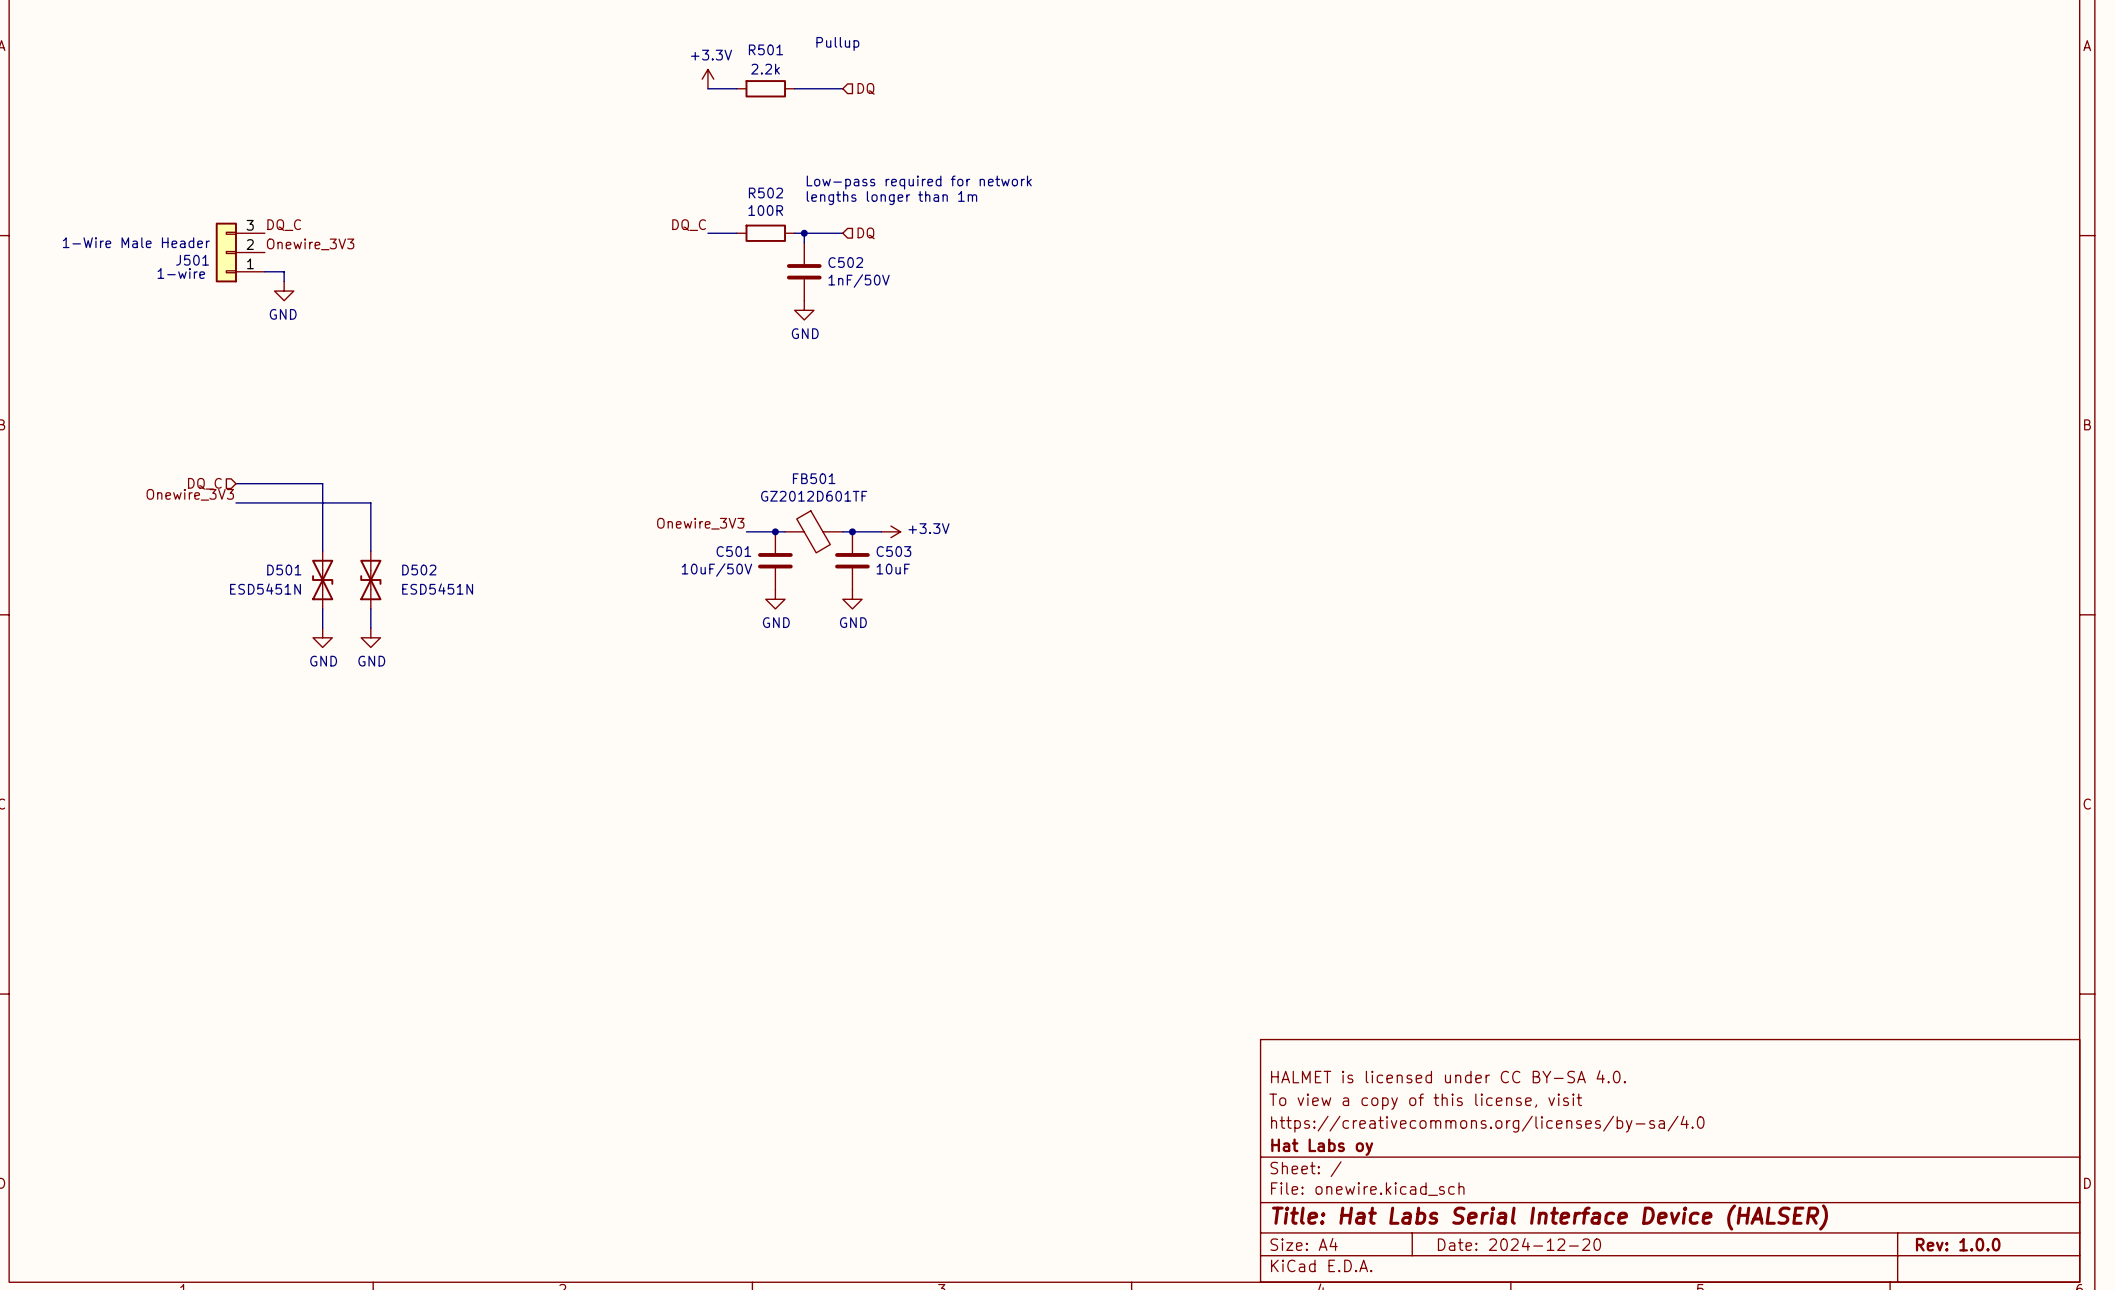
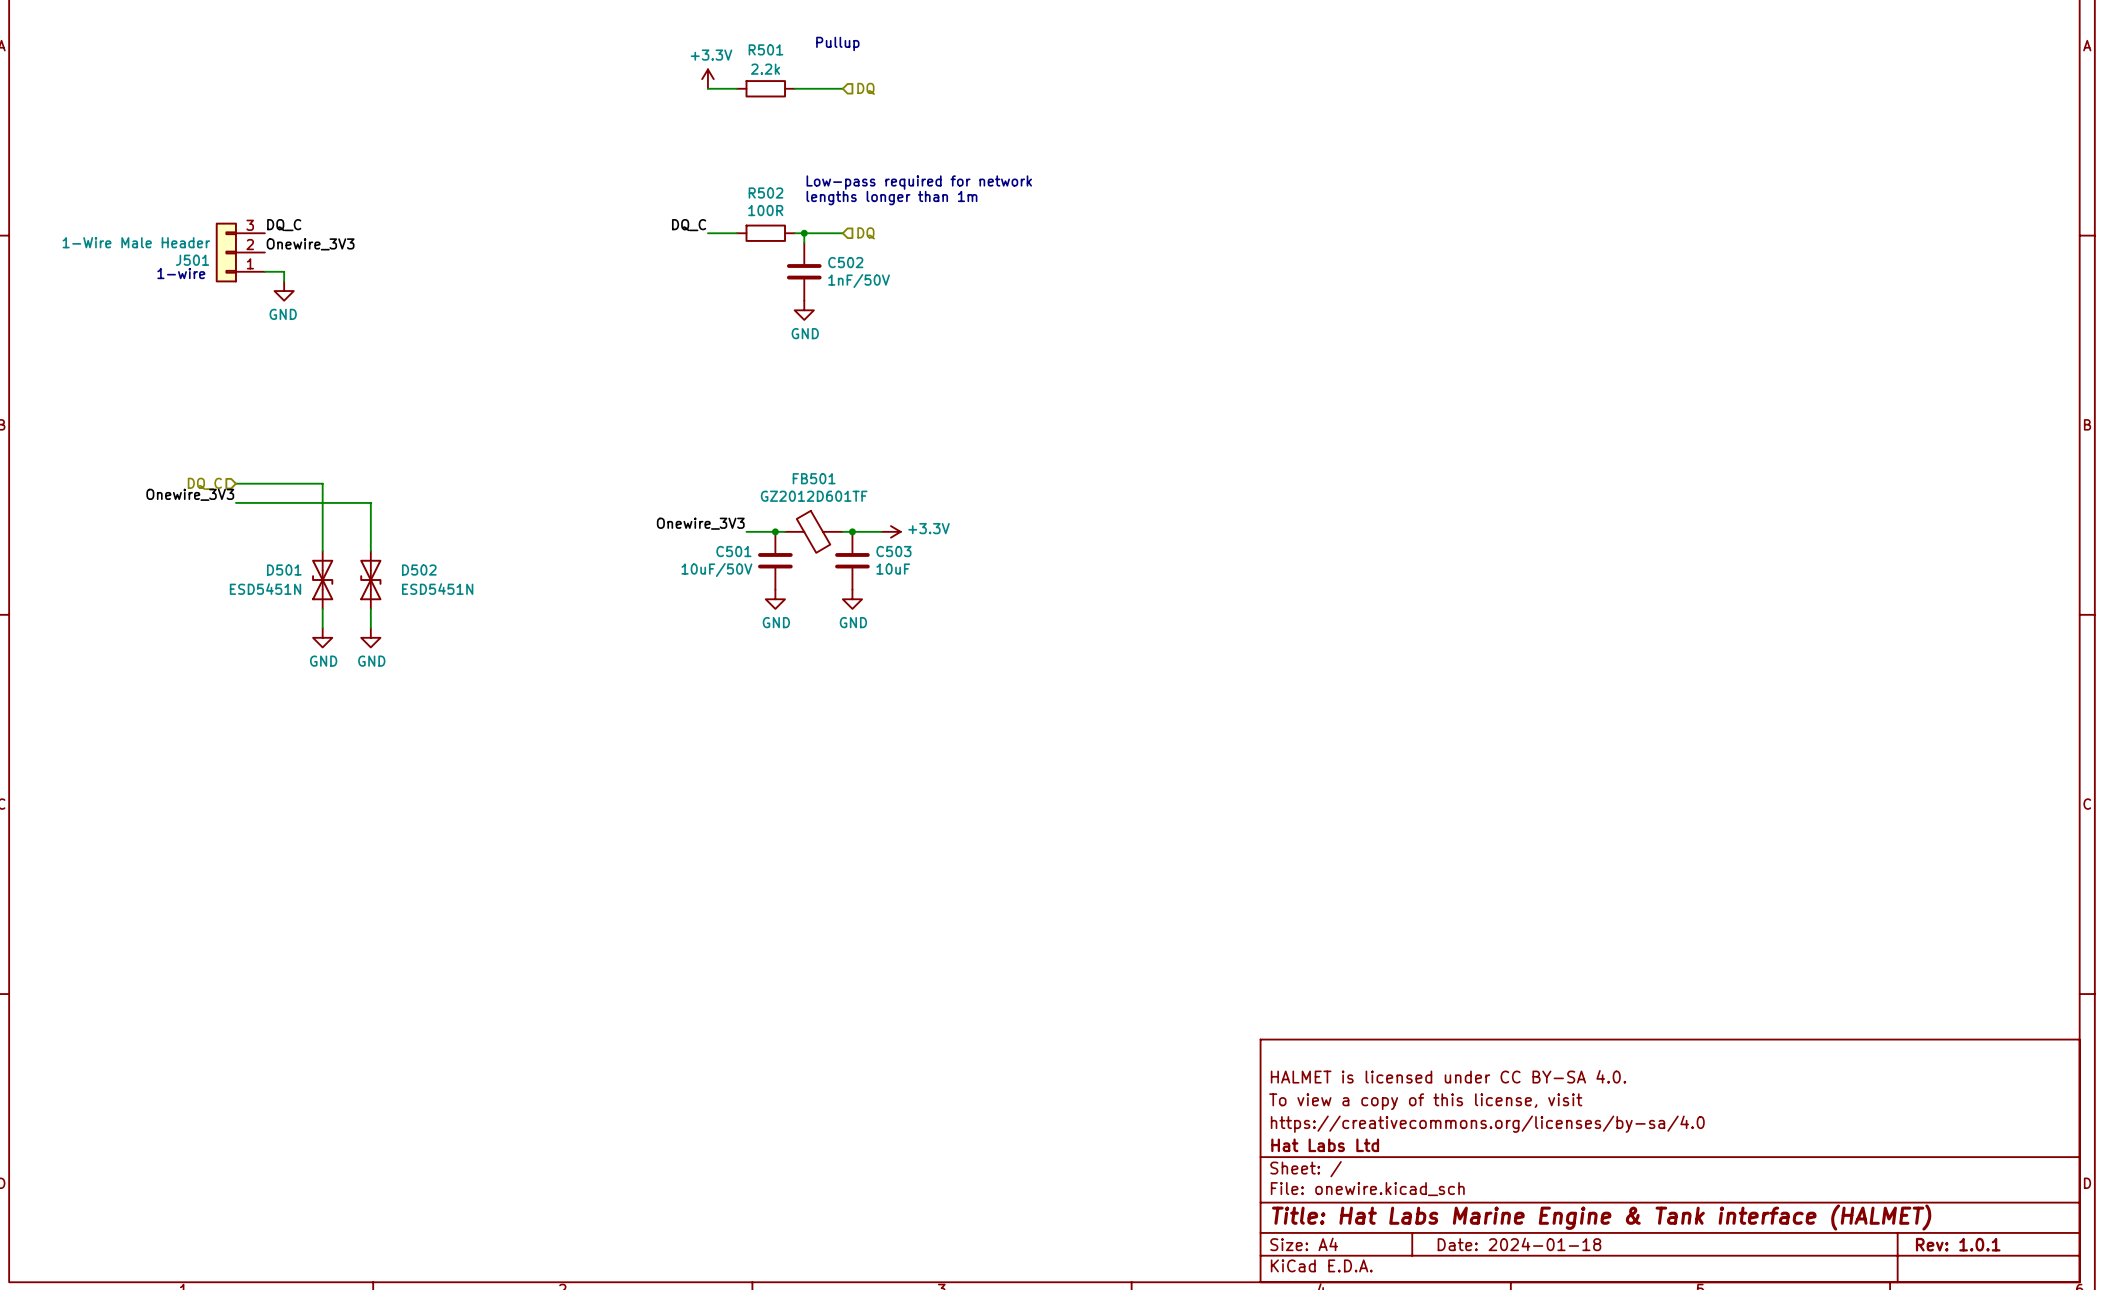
title block: Hat Labs oy (1322, 1147) -> Hat Labs Ltd (1325, 1145)
title block: Title: Hat Labs Serial Interface Device (HALSER) (1550, 1217) -> Title: Hat Labs Marine Engine & Tank interface (HALMET) (1601, 1217)
title block: Date: 2024-12-20 (1519, 1244) -> Date: 2024-01-18 (1519, 1244)
title block: Rev: 1.0.0 (1958, 1244) -> Rev: 1.0.1 (1958, 1244)

